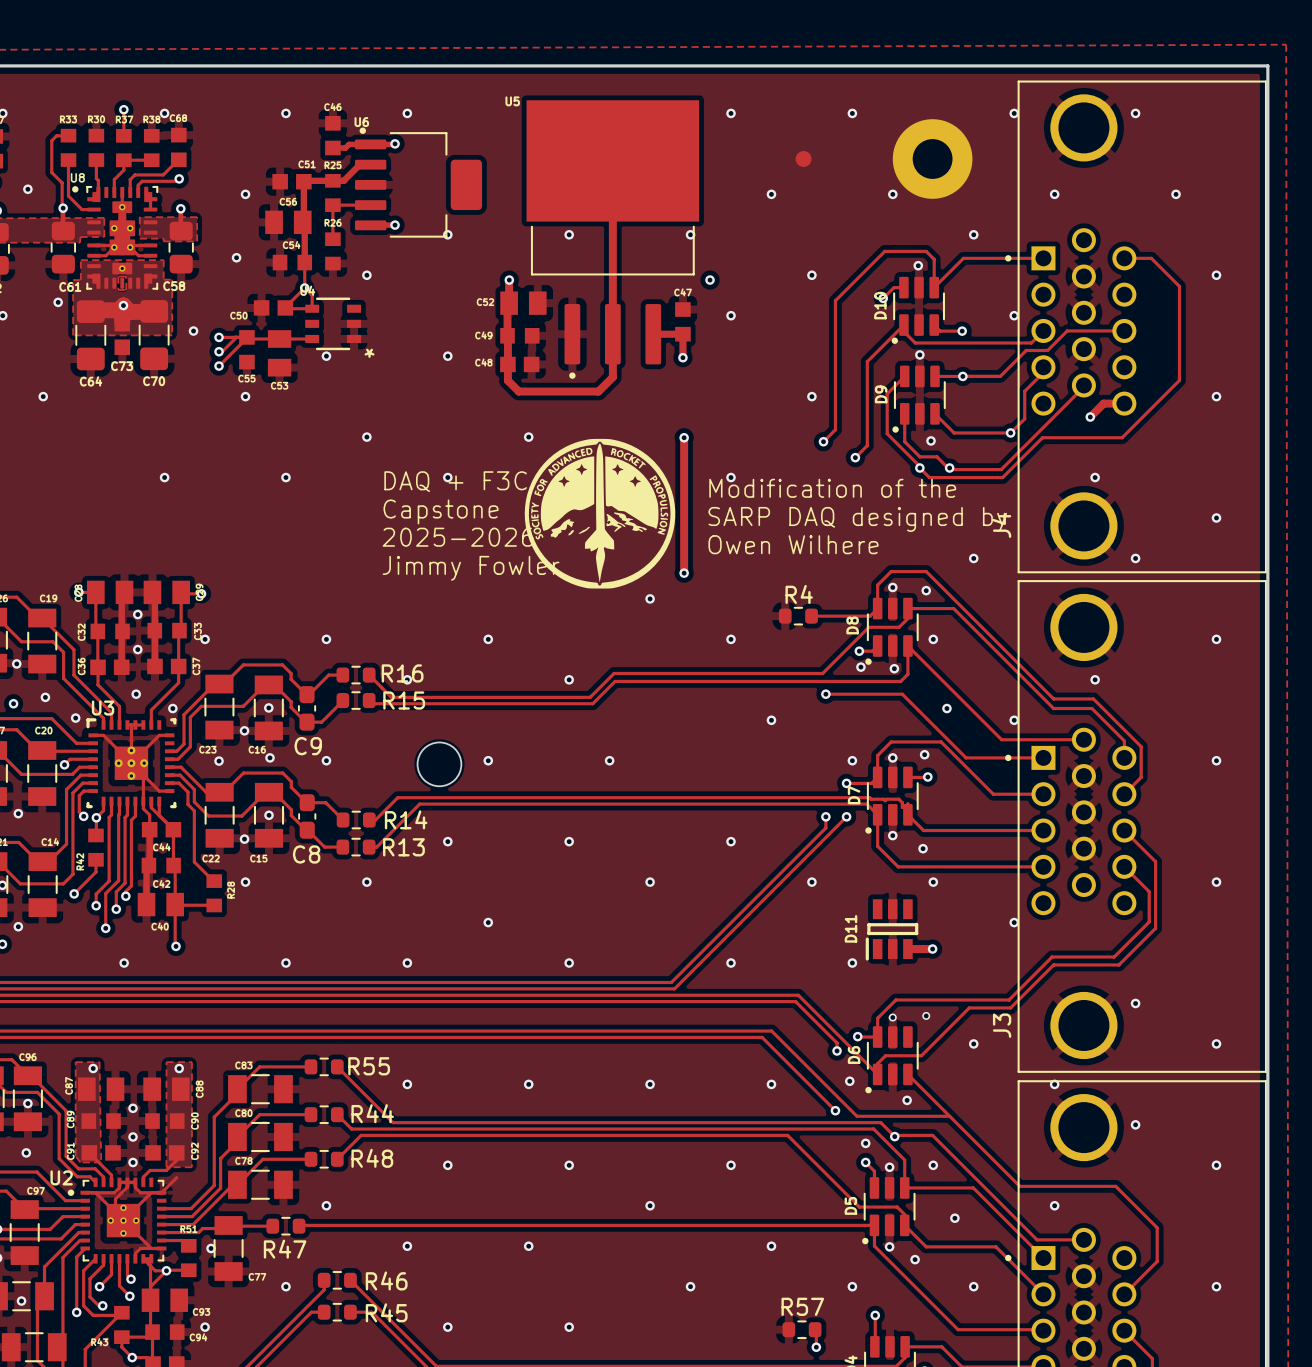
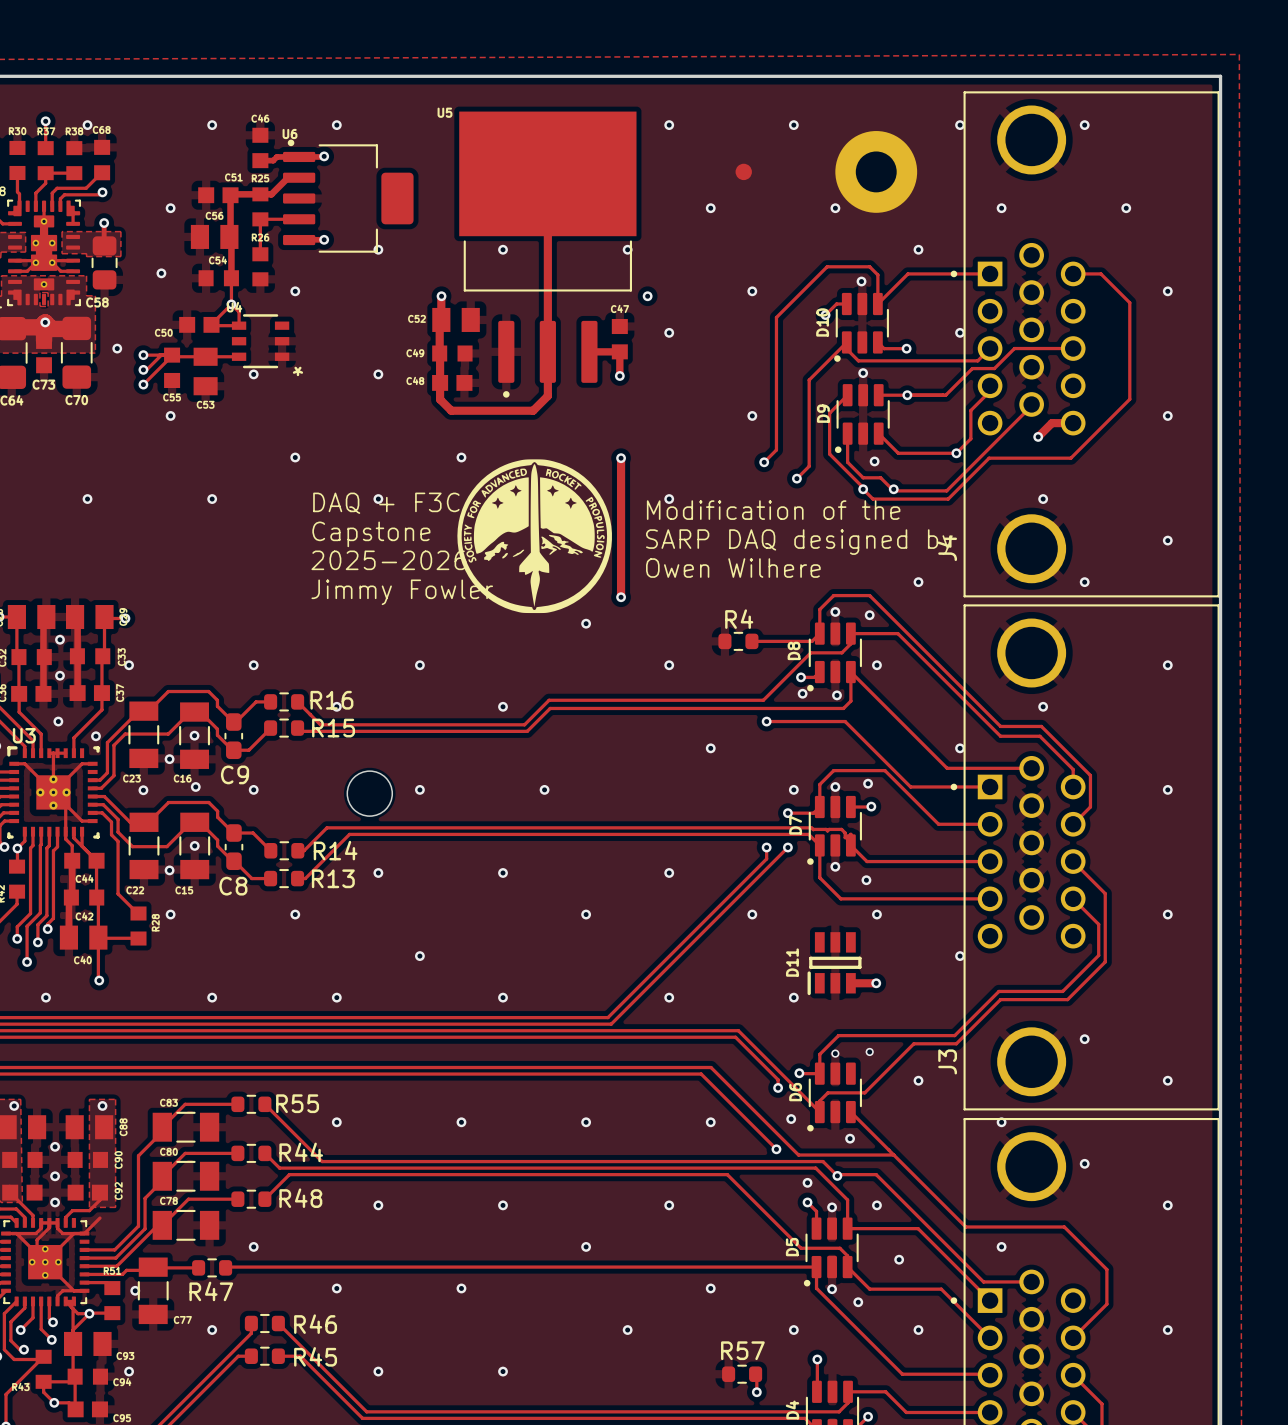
via: (946, 708) -> none

